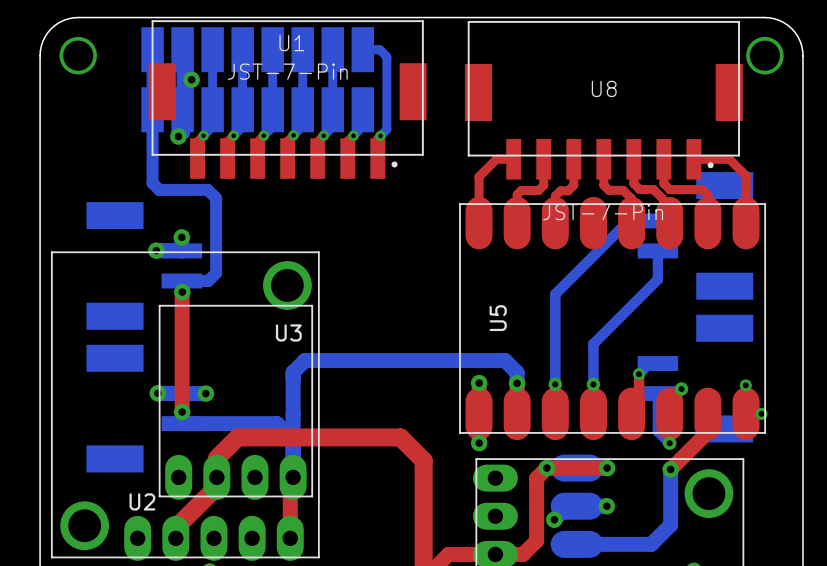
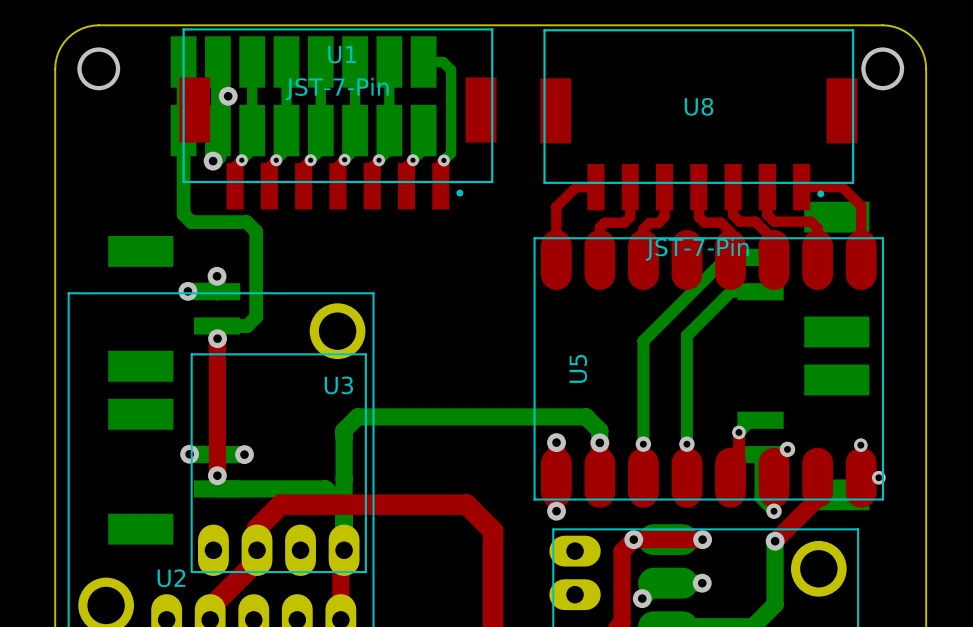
bottom track: (657, 250) (657, 279) (593, 343) -> (760, 291) (730, 291) (686, 335) (686, 397)

